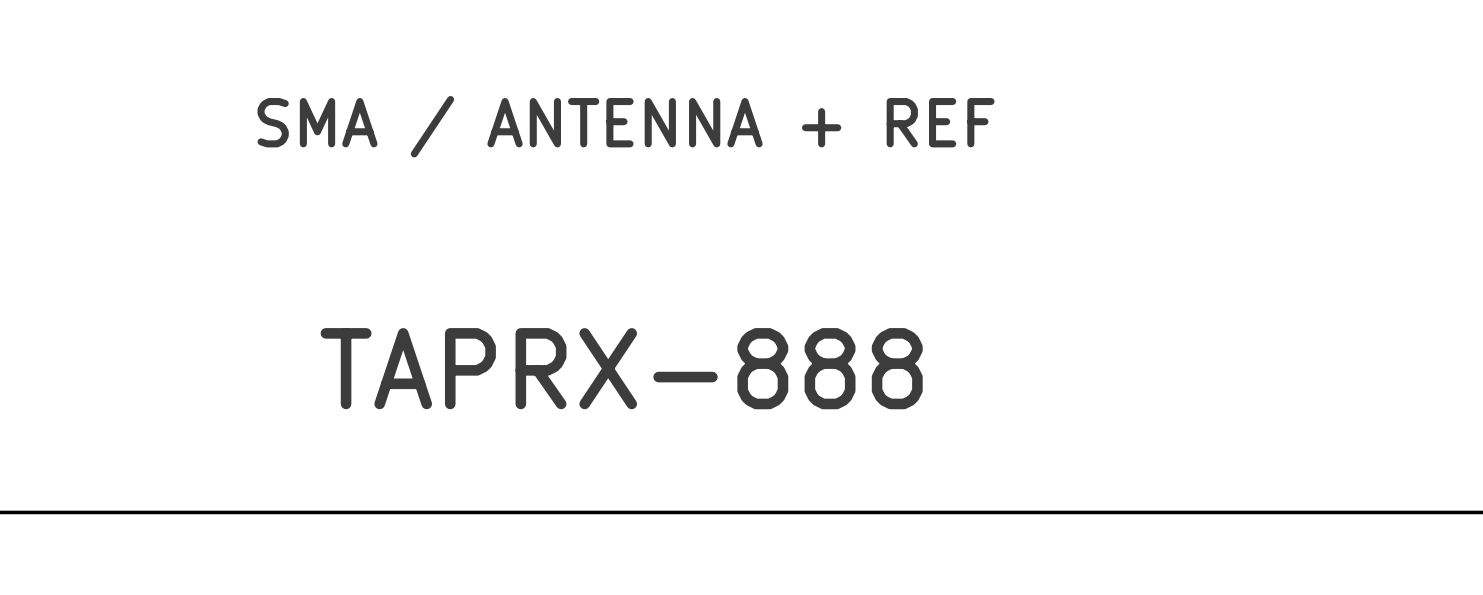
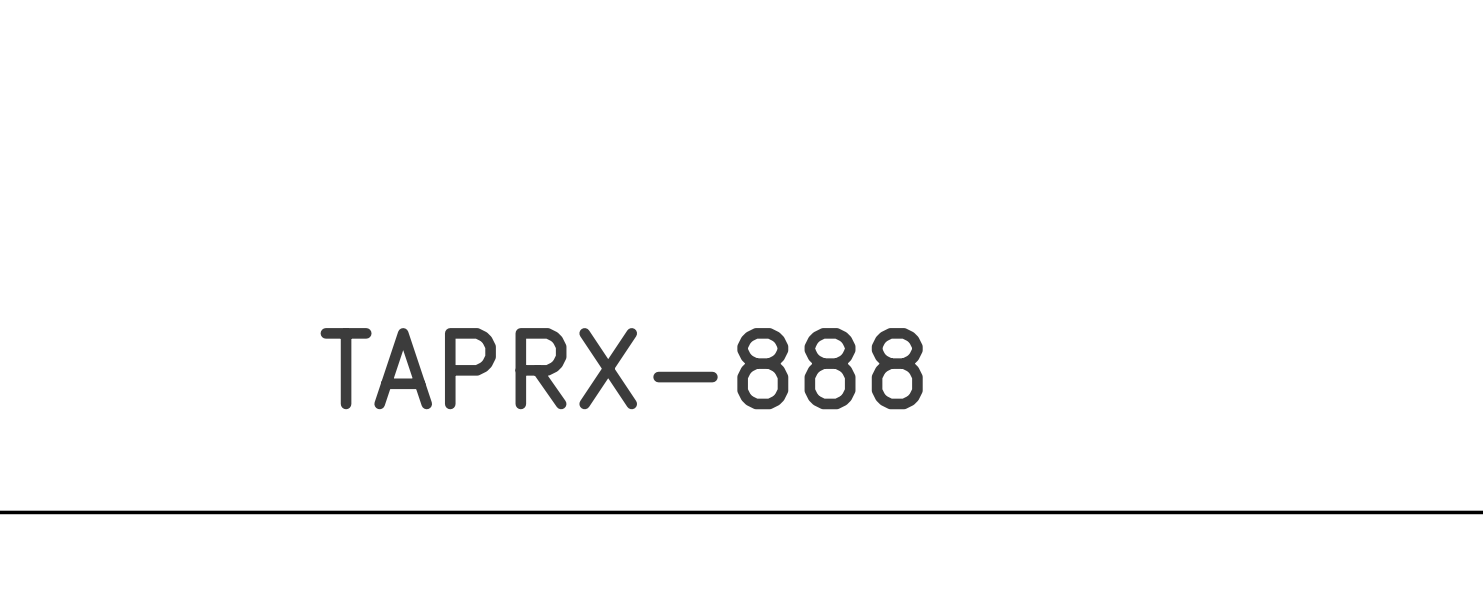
text: SMA / ANTENNA + REF (626, 126) -> none

